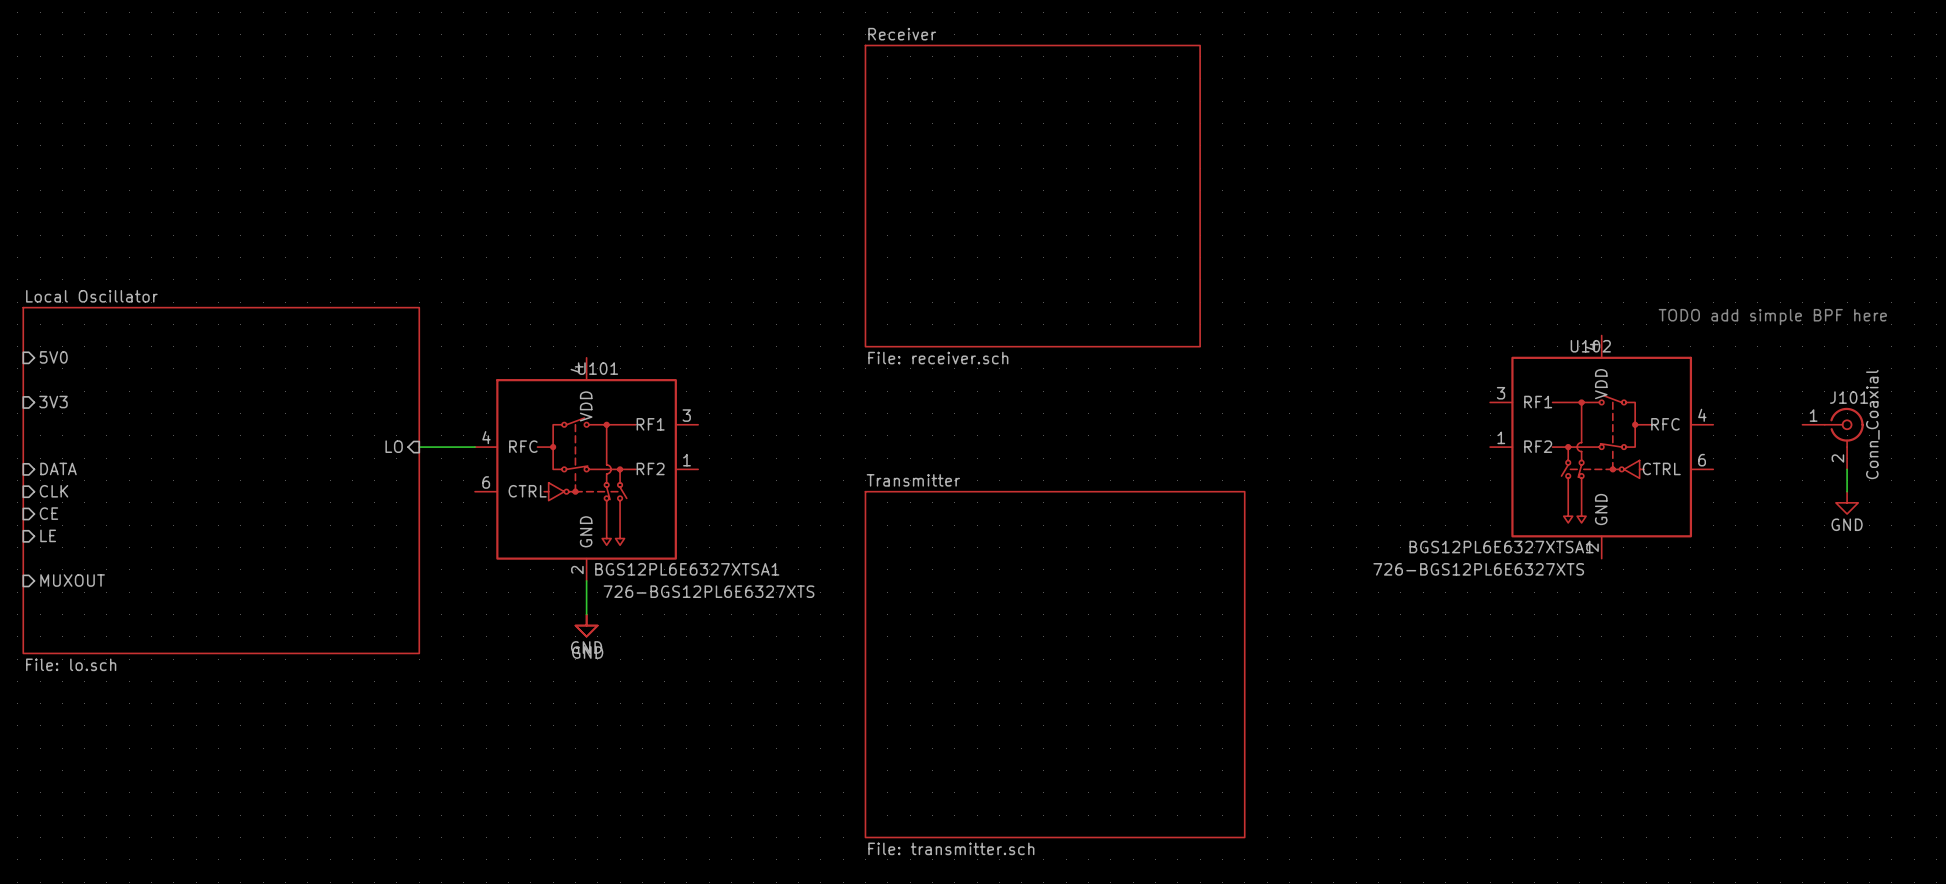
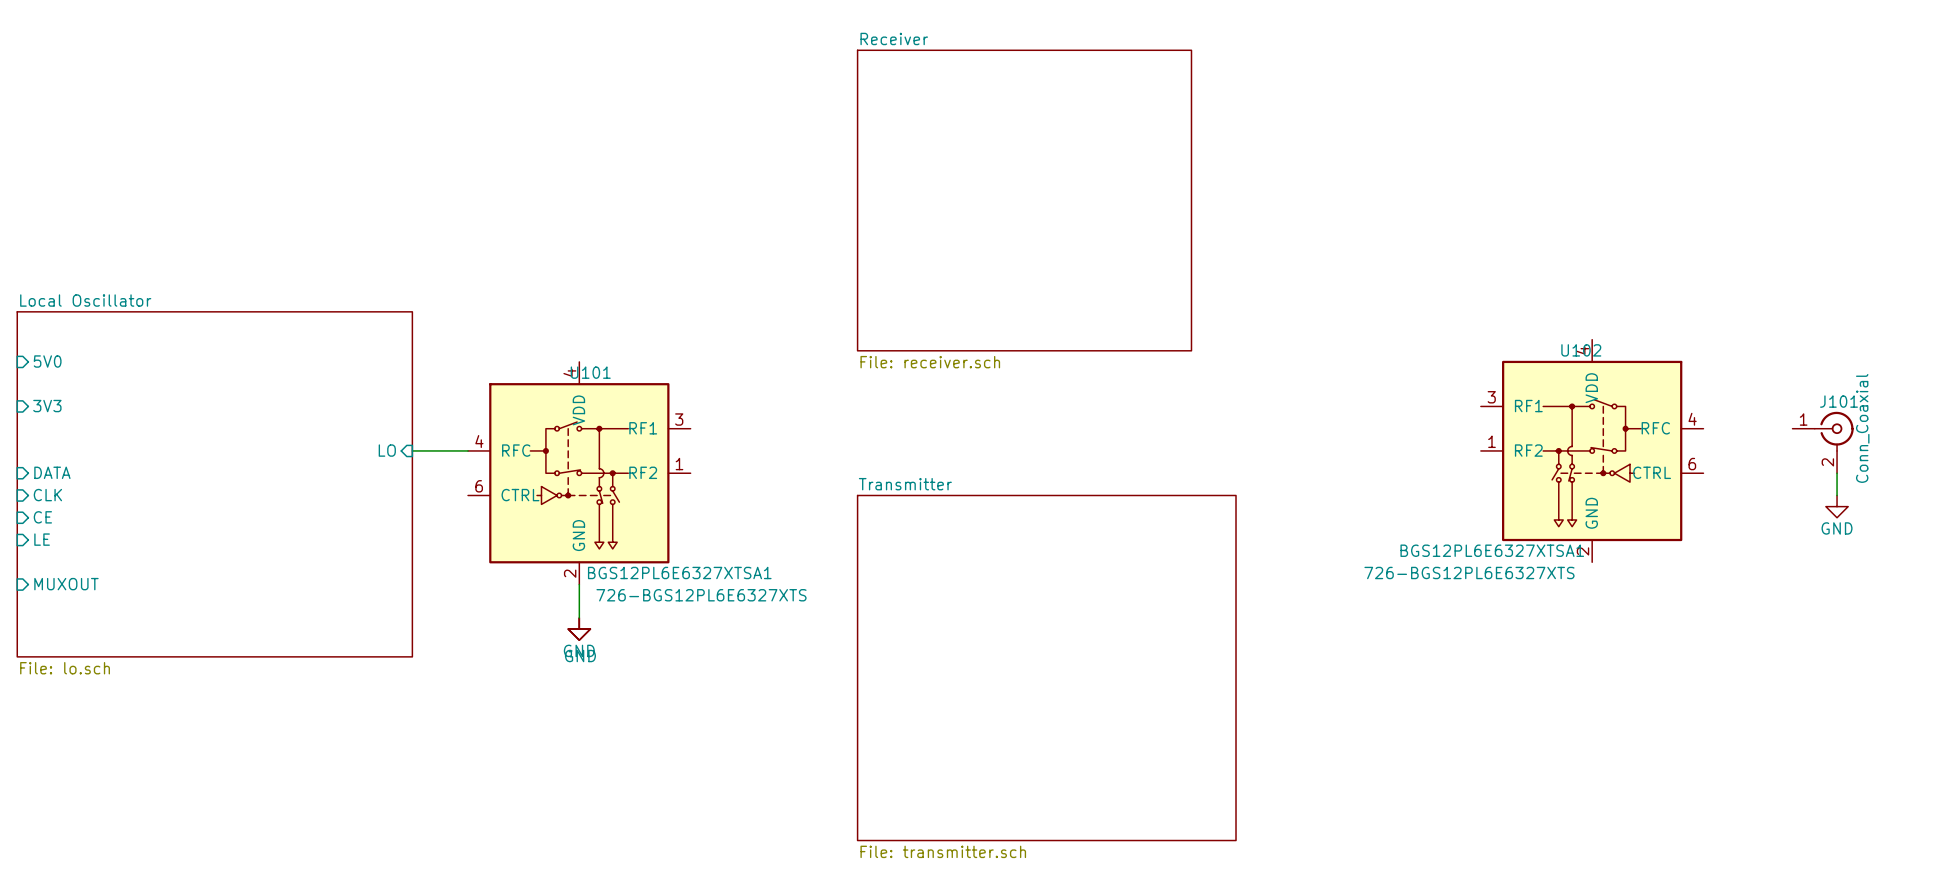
text: TODO add simple BPF here (1772, 317) -> none

